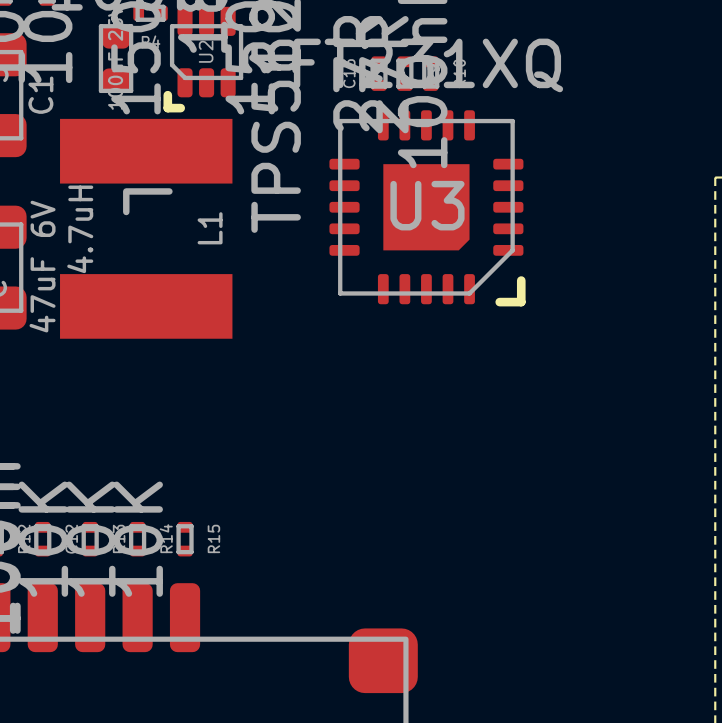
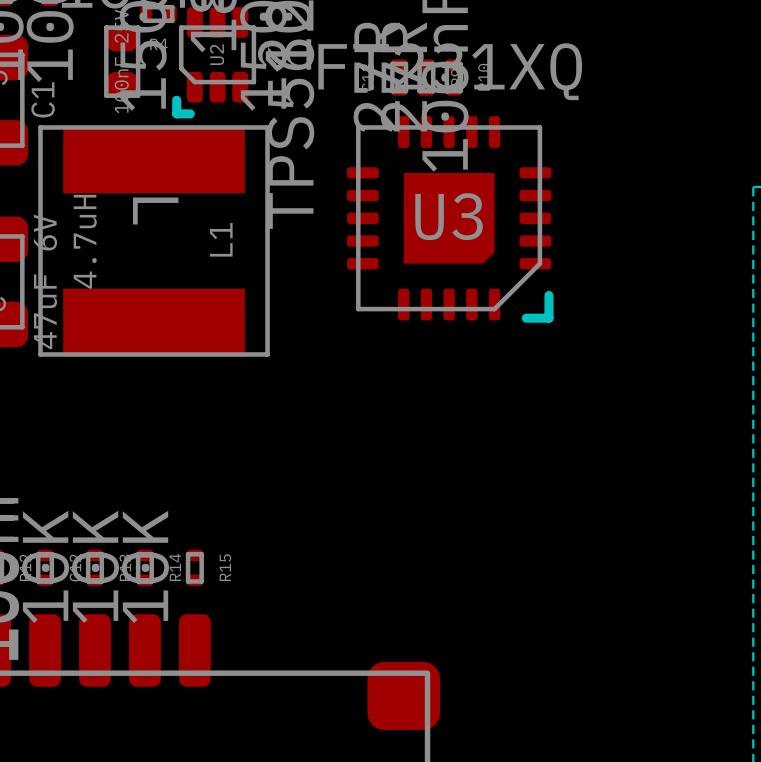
L1 footprint: [60, 118, 233, 339] -> [38, 125, 270, 357]

